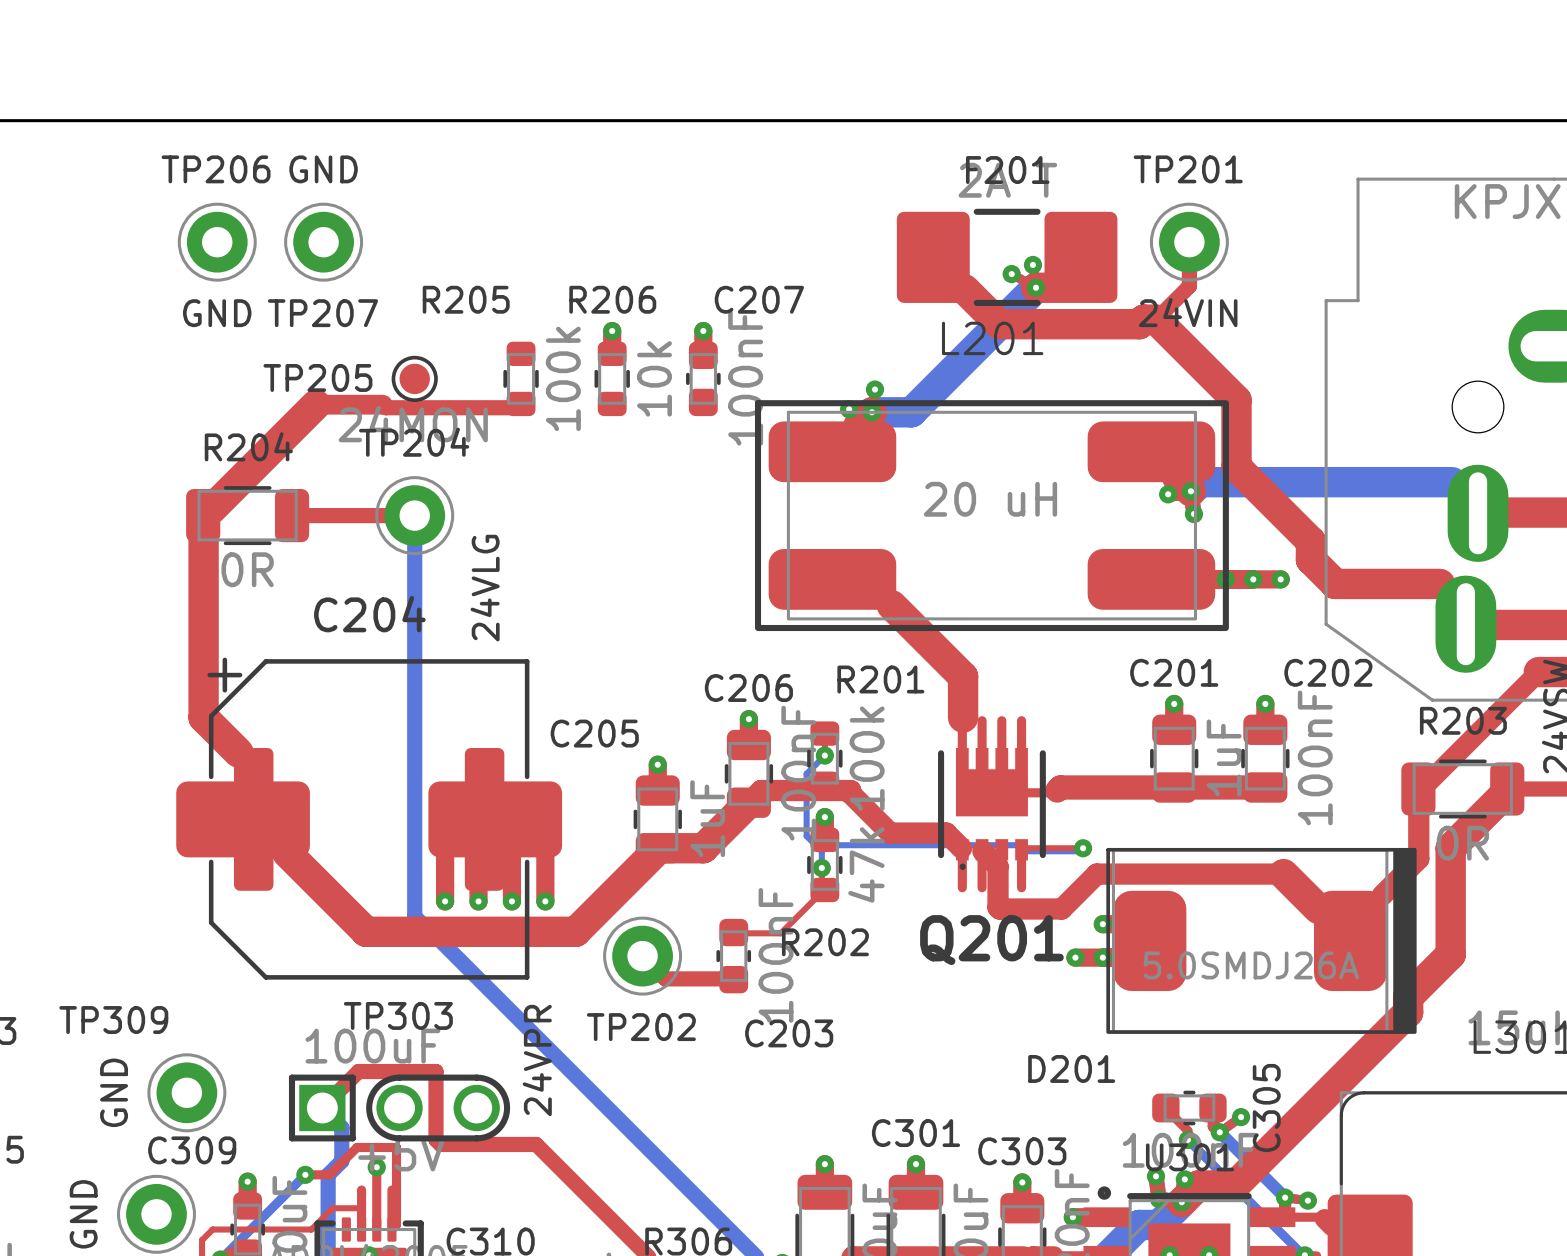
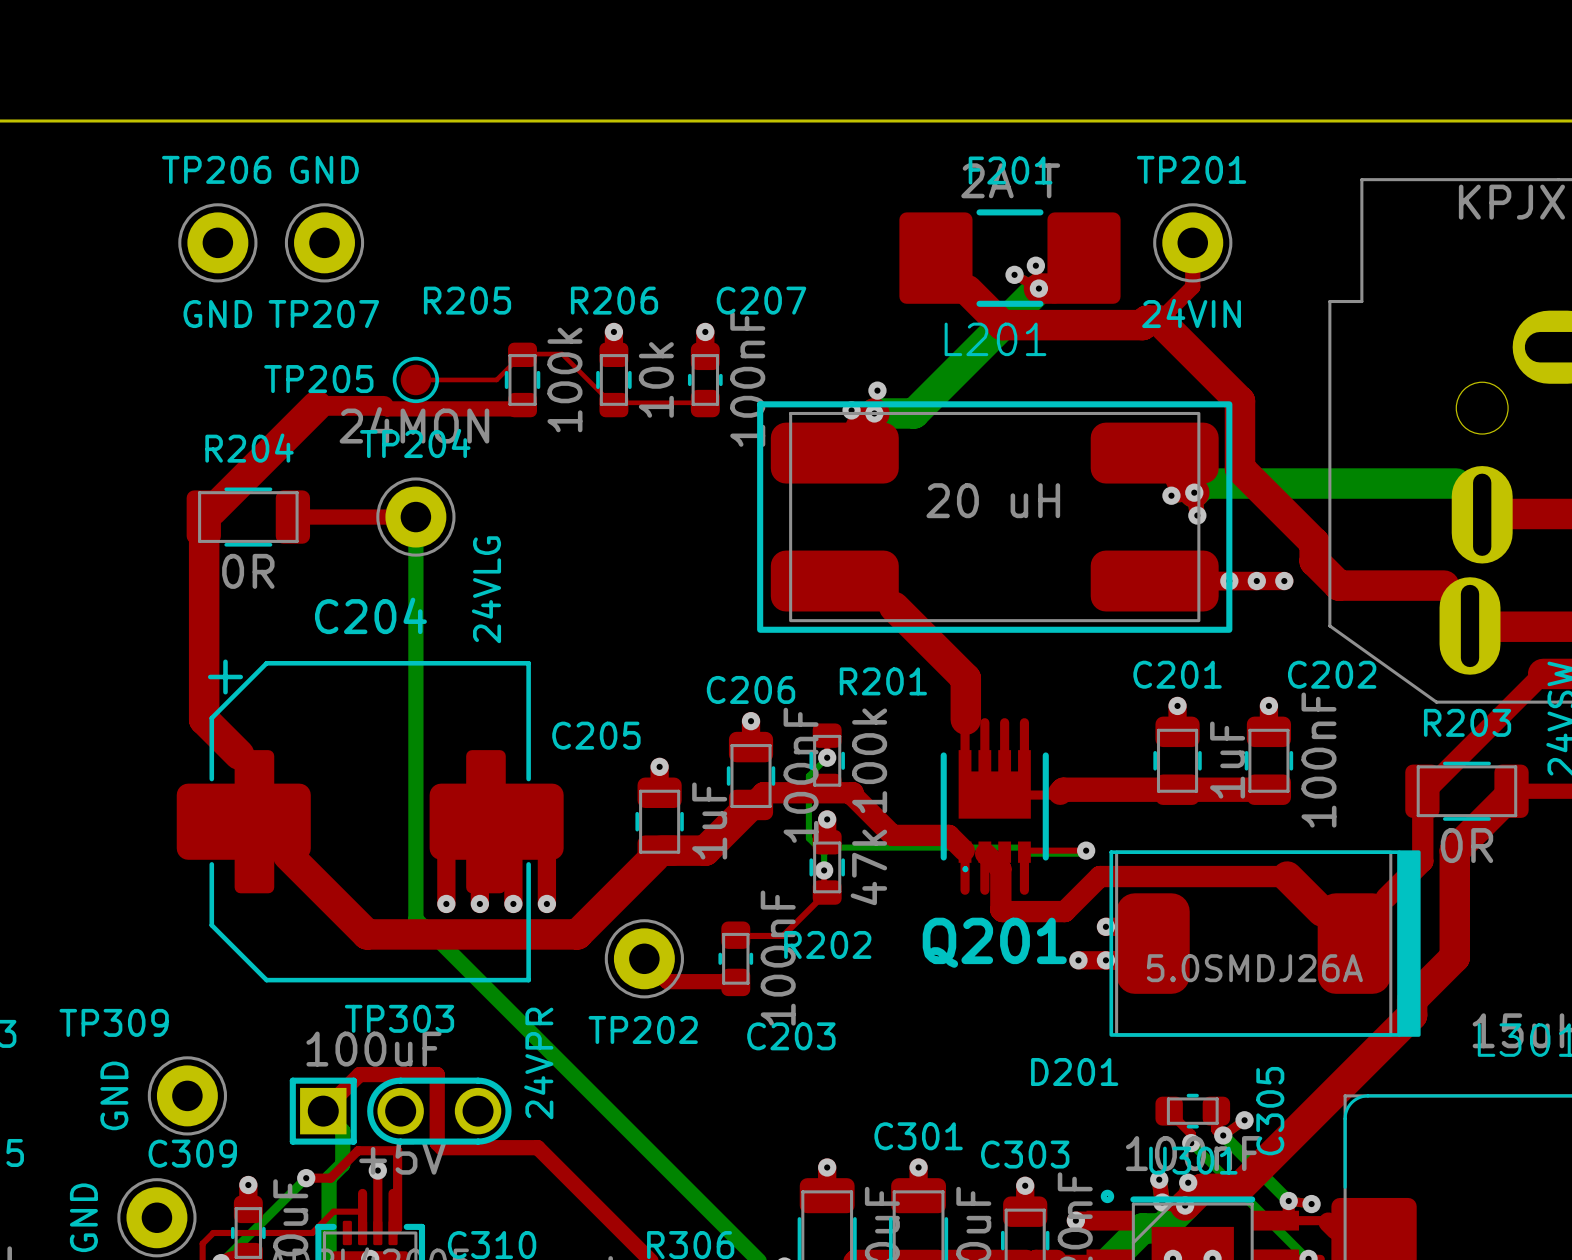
top track: none -> (524, 354) (562, 354) (612, 404)
top track: none -> (521, 355) (496, 379) (417, 379)
top track: none -> (703, 402) (615, 404)

